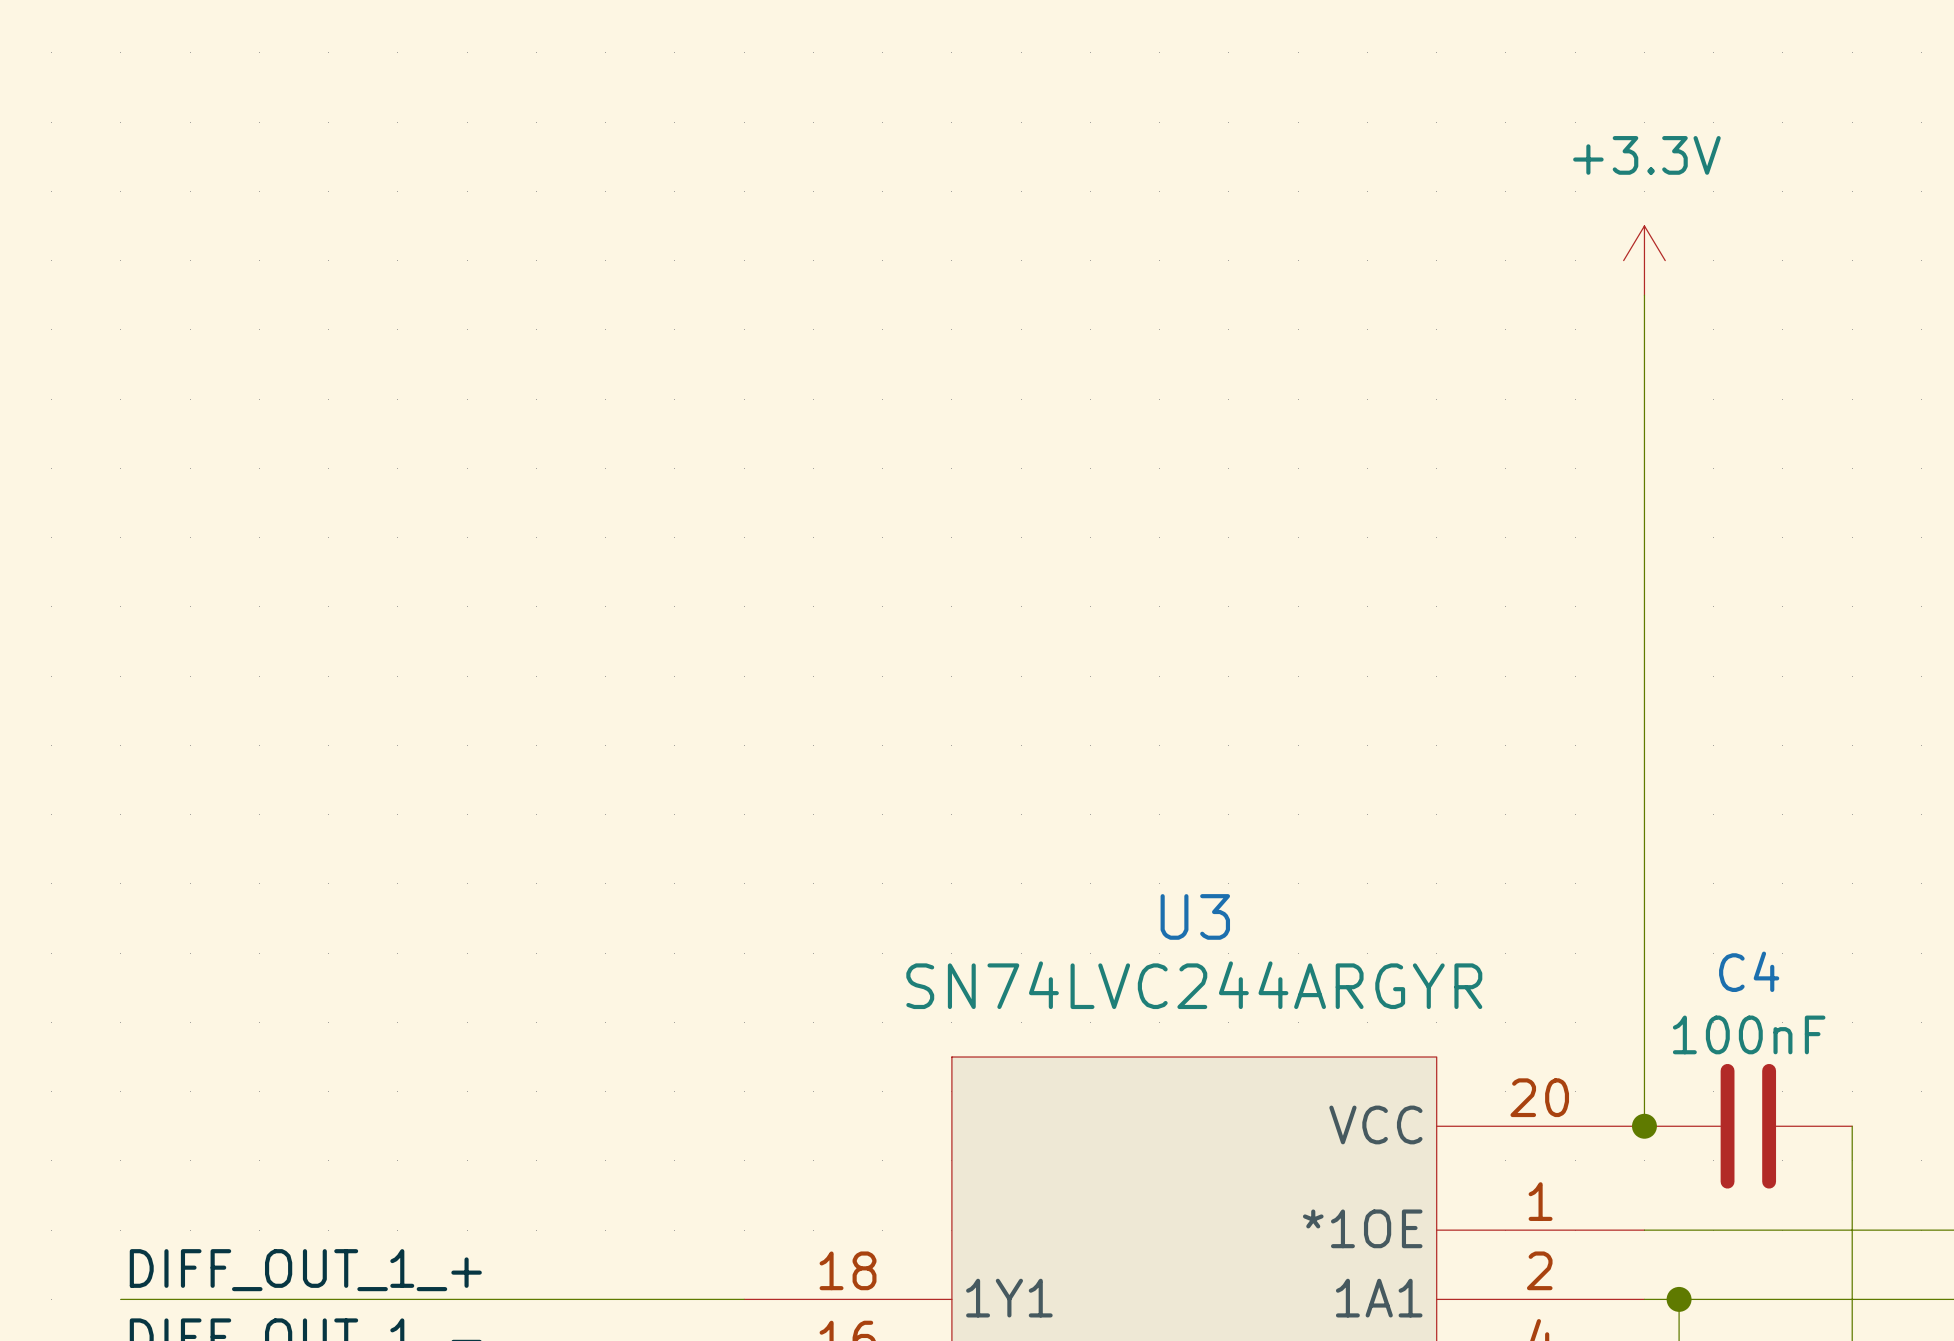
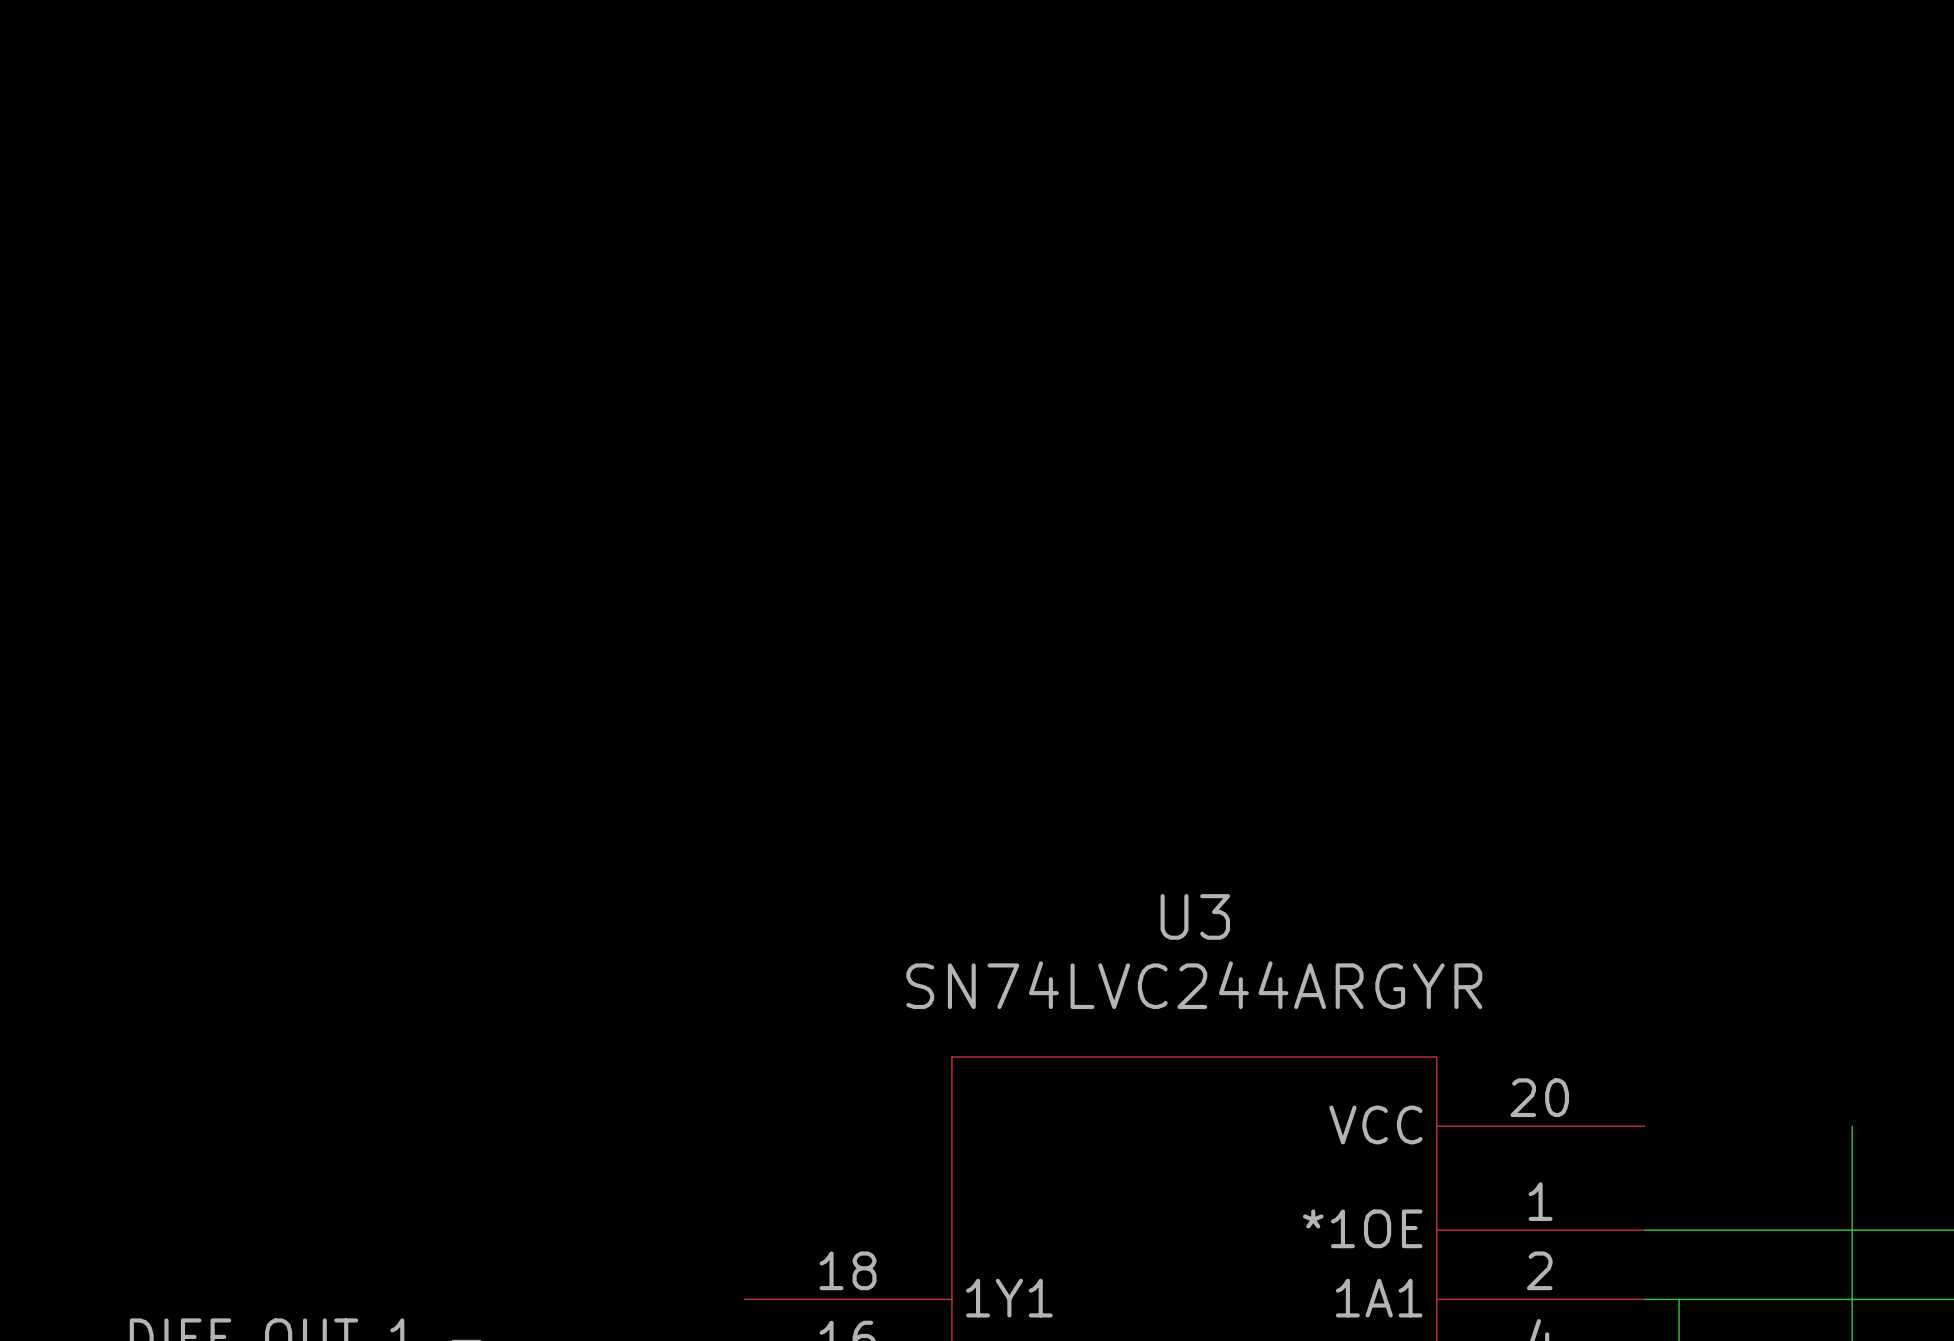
power symbol: +3.3V (1644, 260) -> none
wire: (1644, 295) (1644, 1126) -> none
junction: (1644, 1126) -> none
C4: 100nF (1748, 1126) -> none
label: DIFF_OUT_1_+ (305, 1270) -> none
wire: (120, 1299) (744, 1299) -> none
junction: (1679, 1299) -> none

